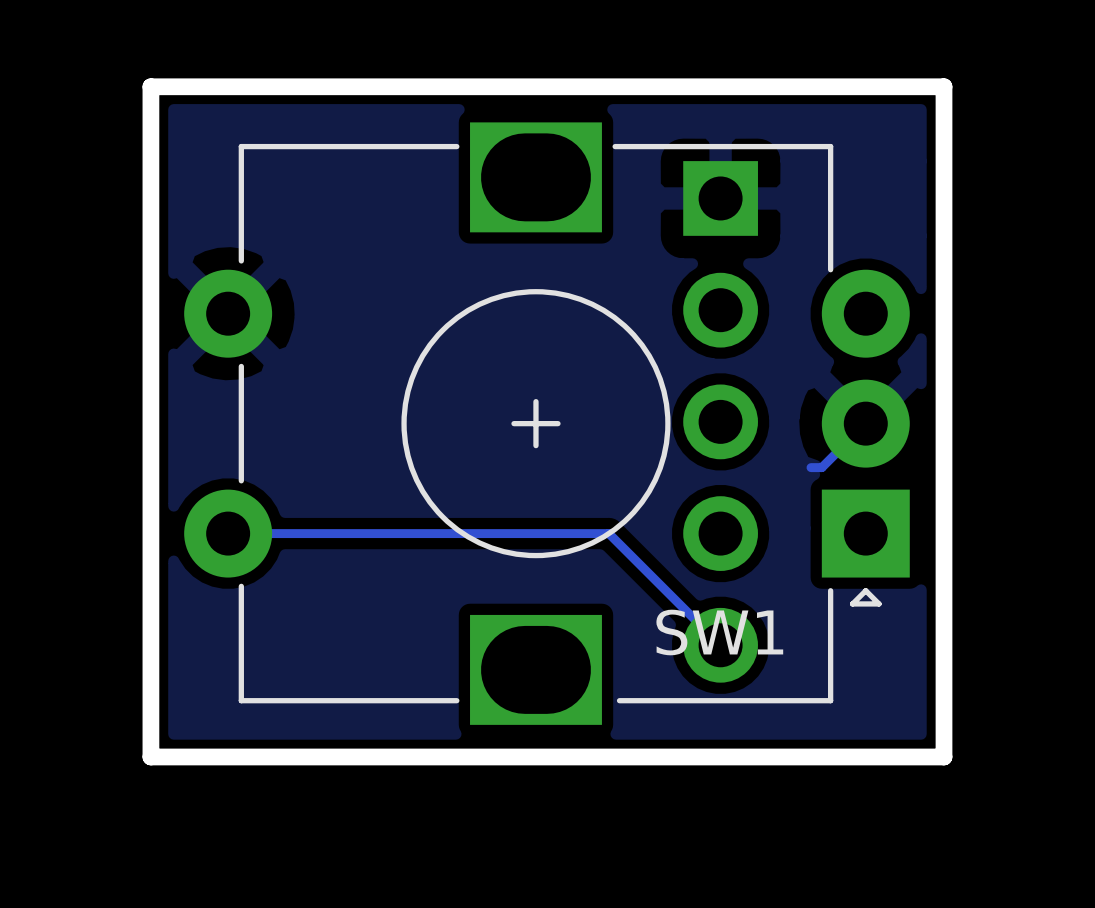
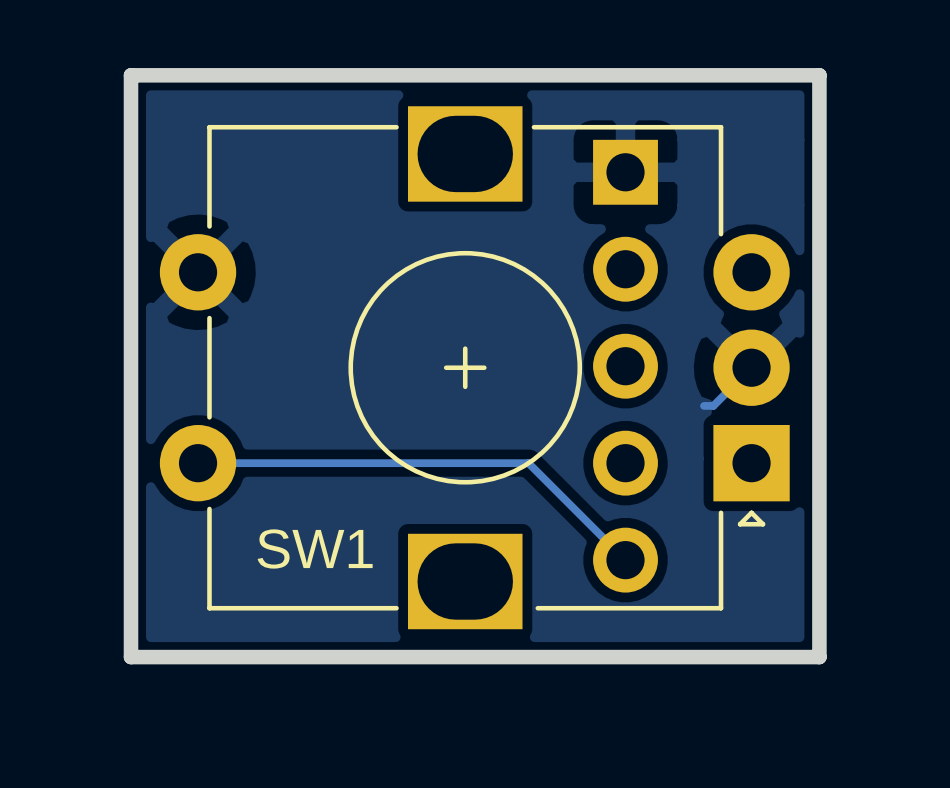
SW1 name position: SW1 (719, 632) -> SW1 (315, 548)

